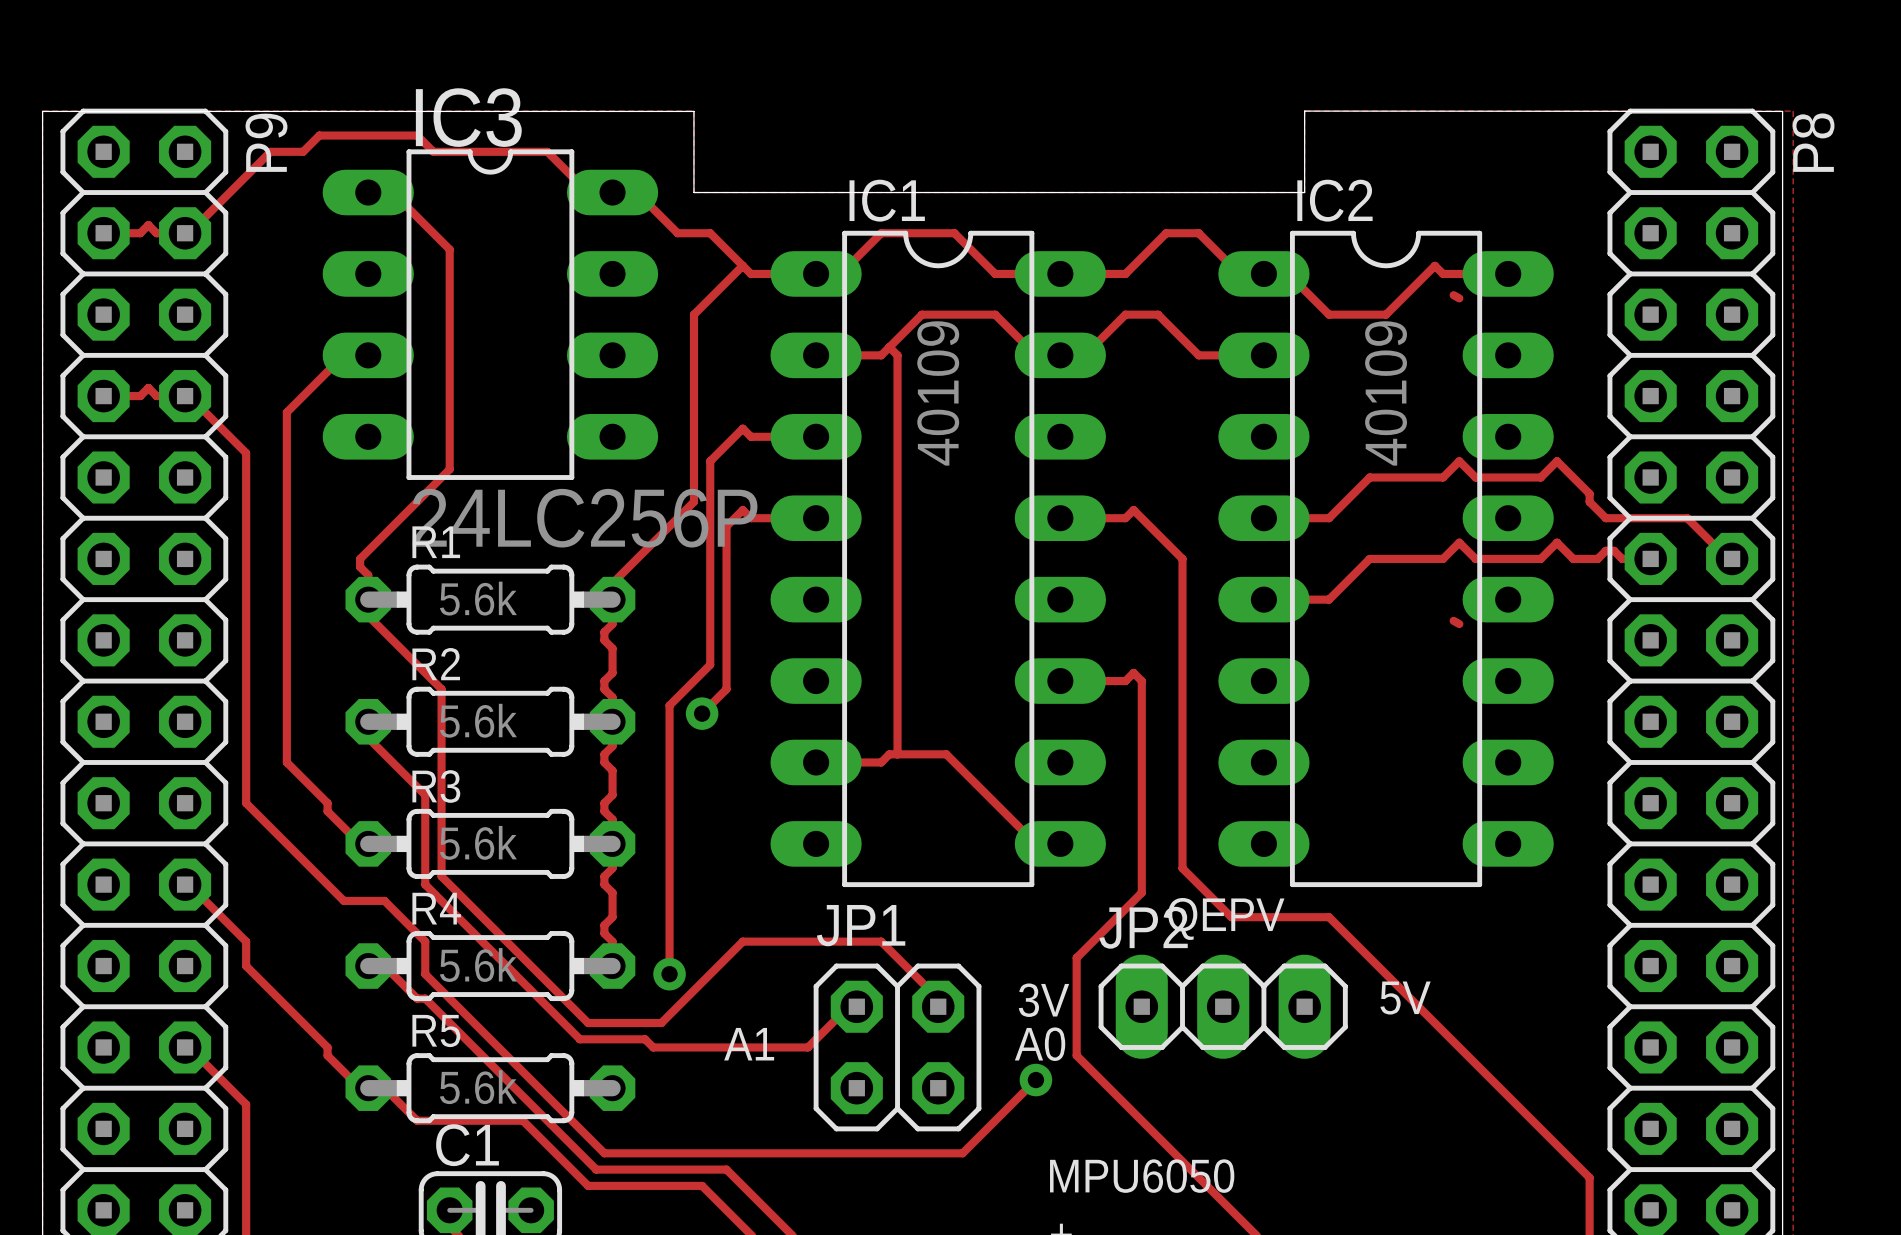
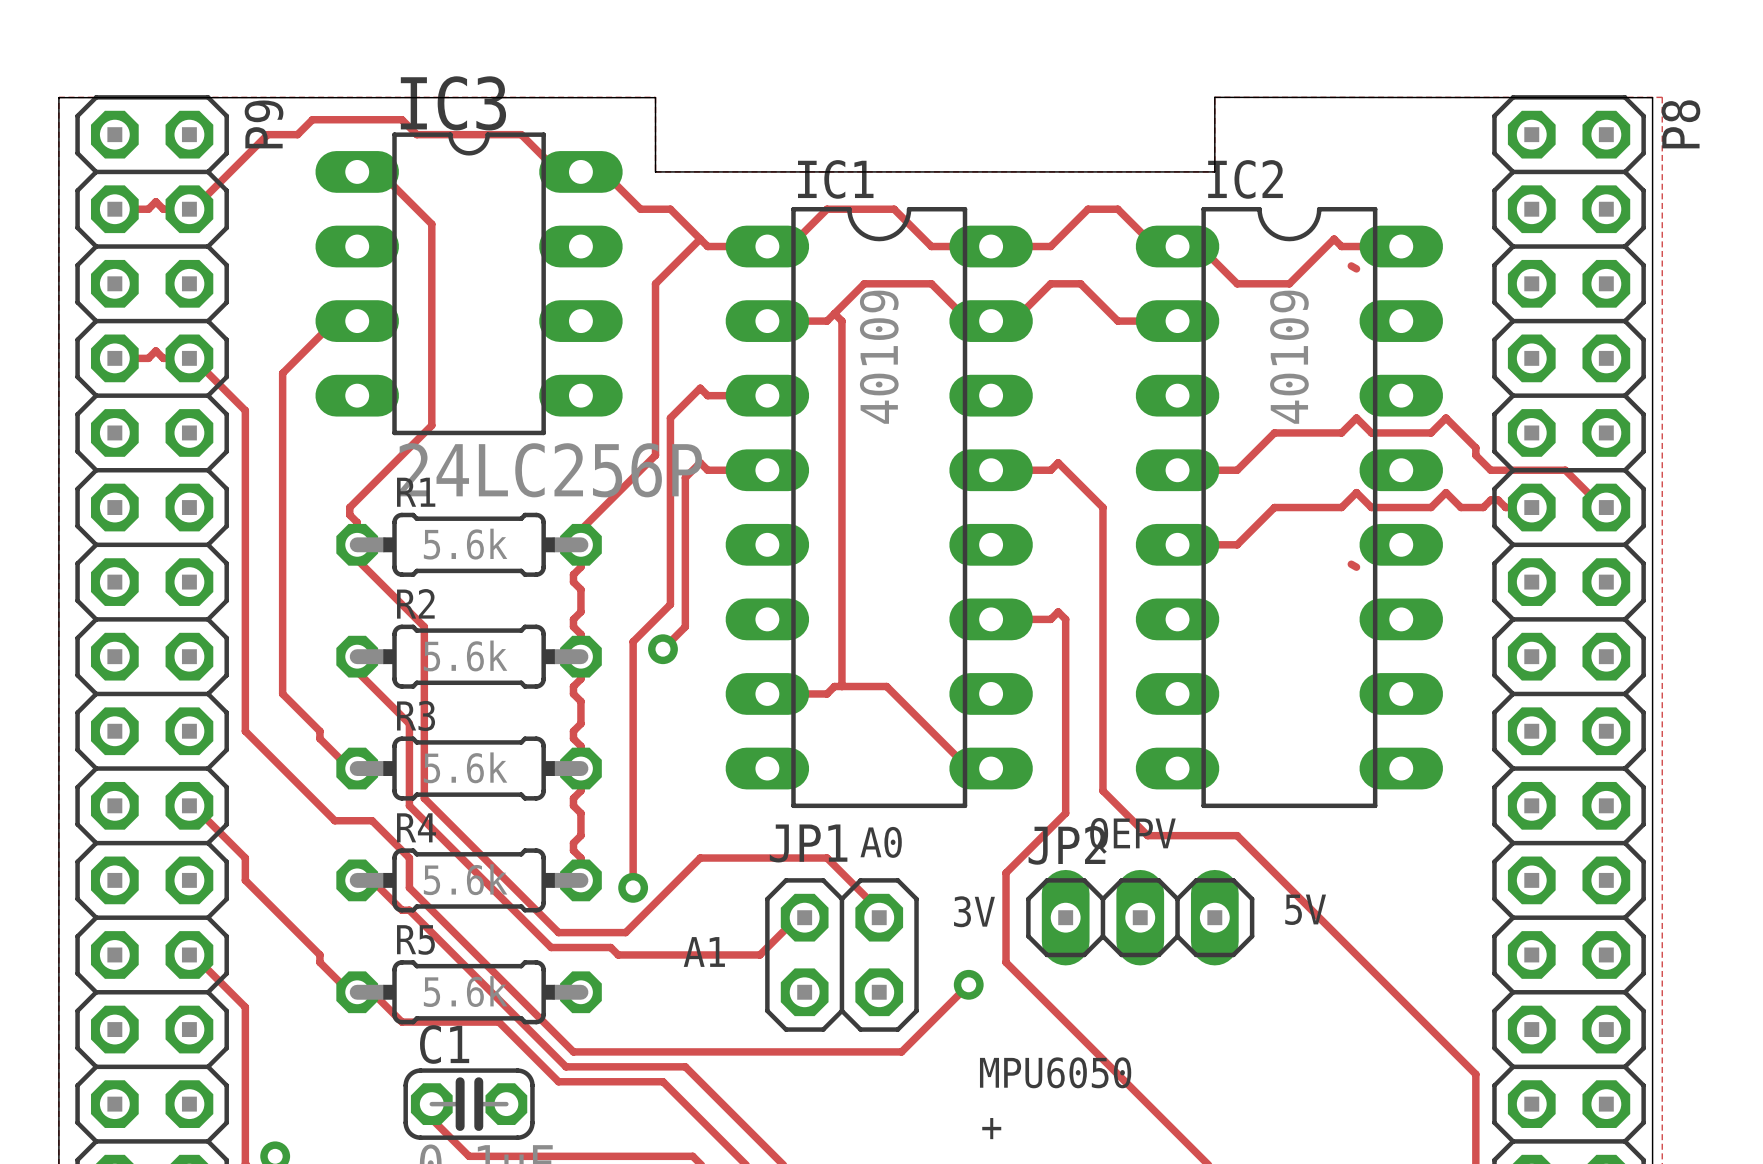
text position: A0 (1040, 1044) -> A0 (881, 842)

